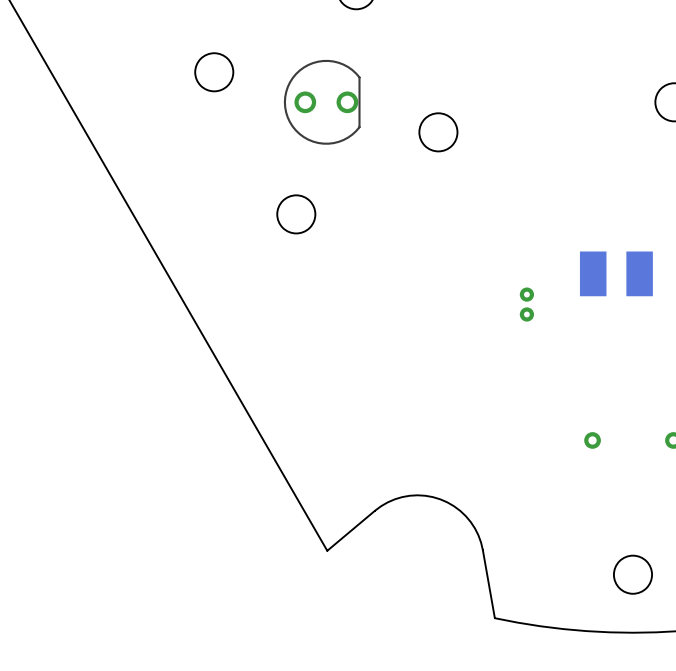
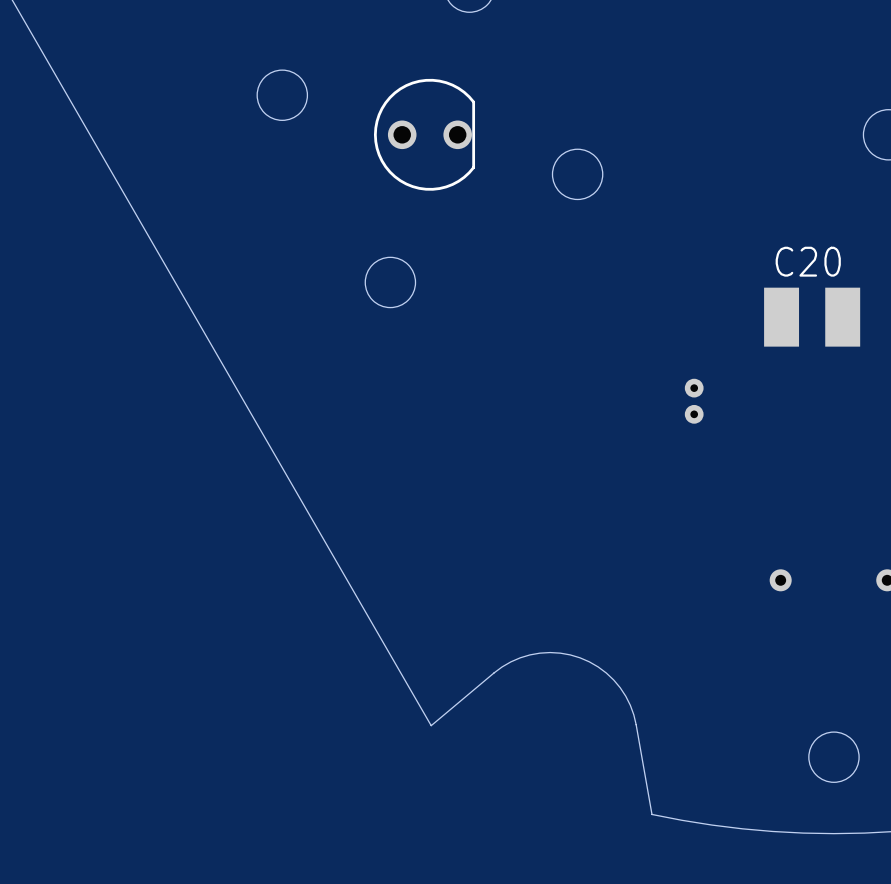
C20: none -> (812, 317)
part: (616, 273) -> none

